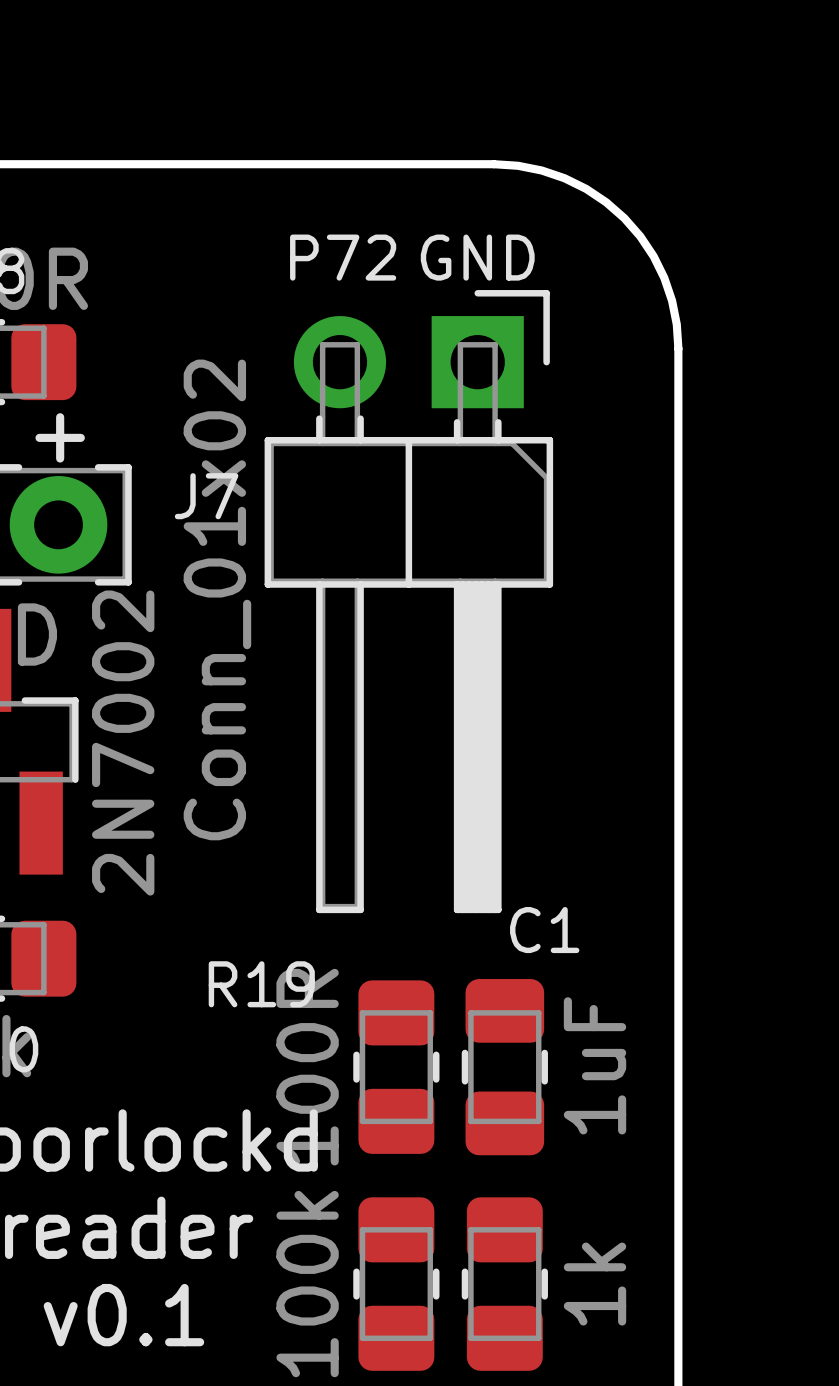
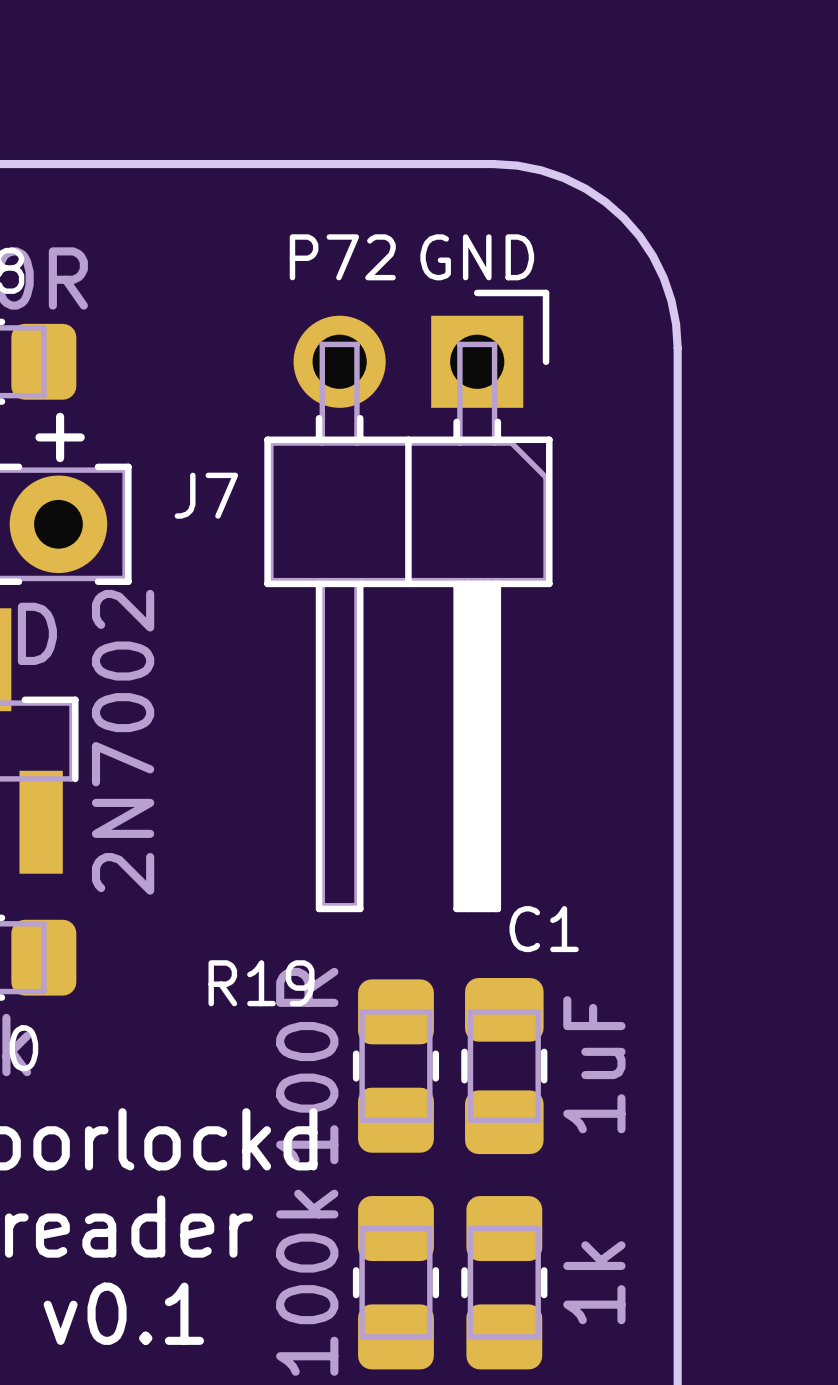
J7 value: Conn_01x02 (217, 599) -> none

